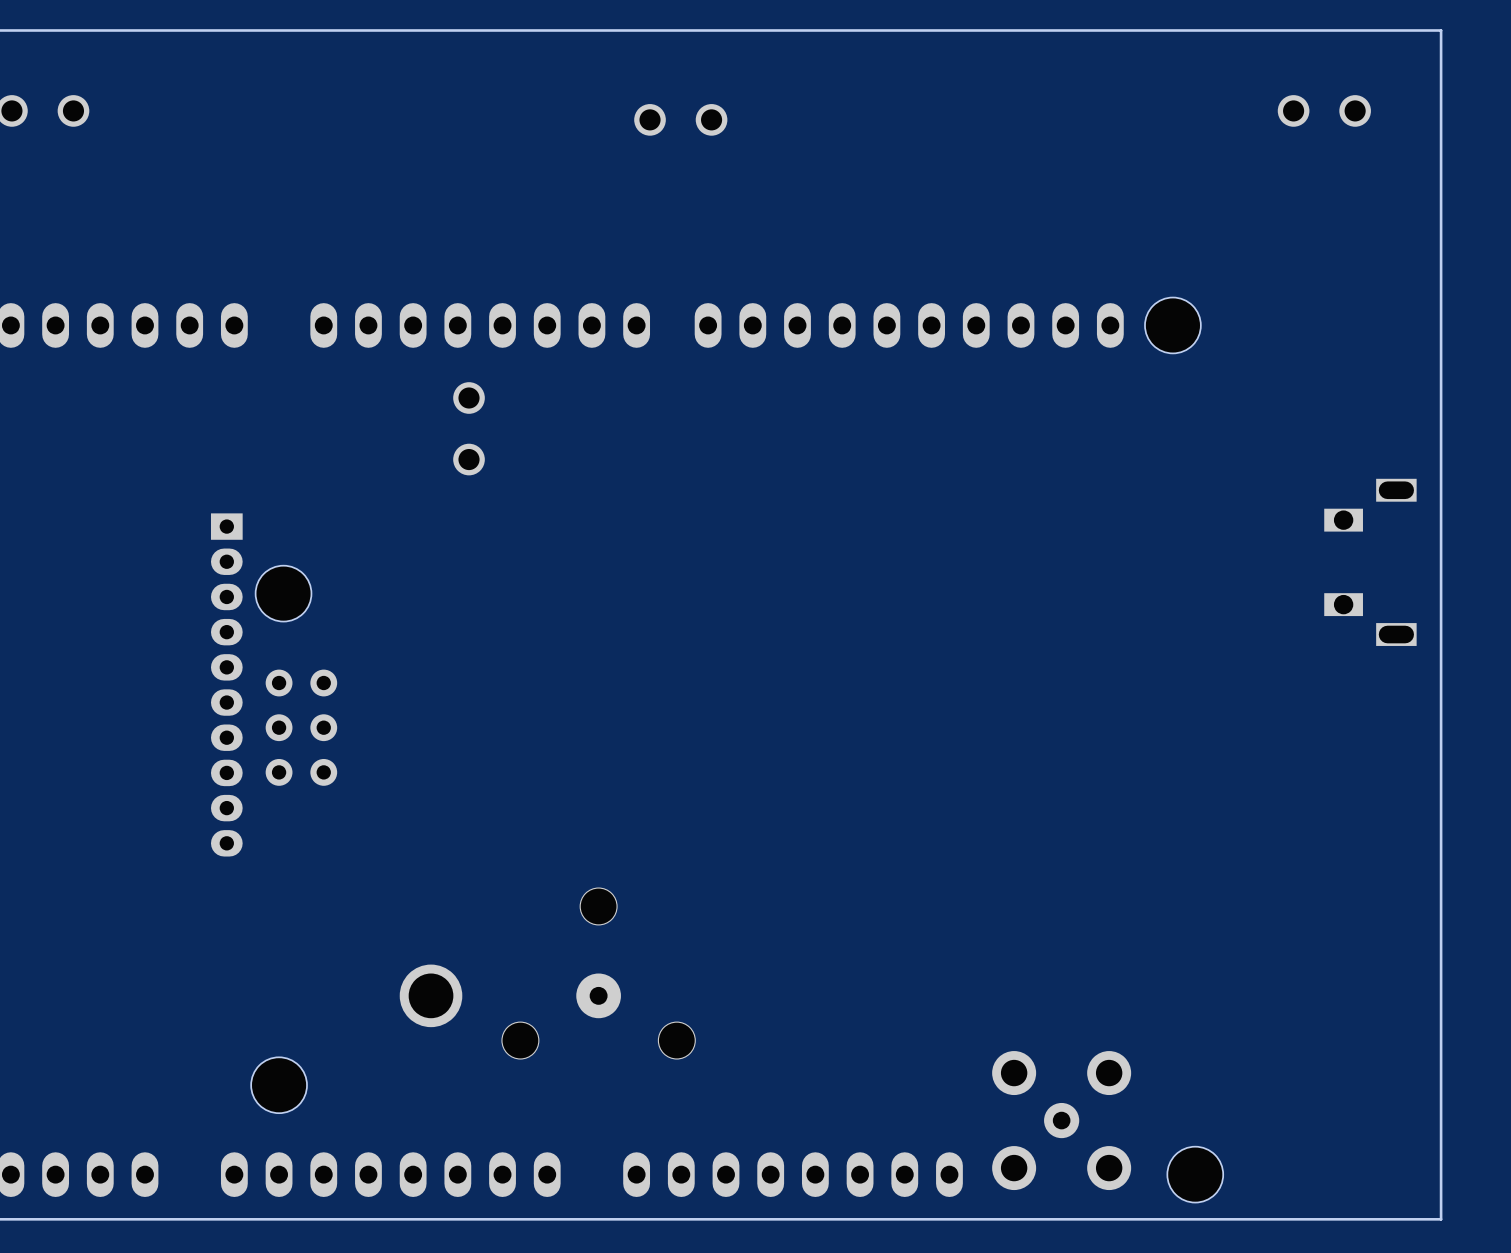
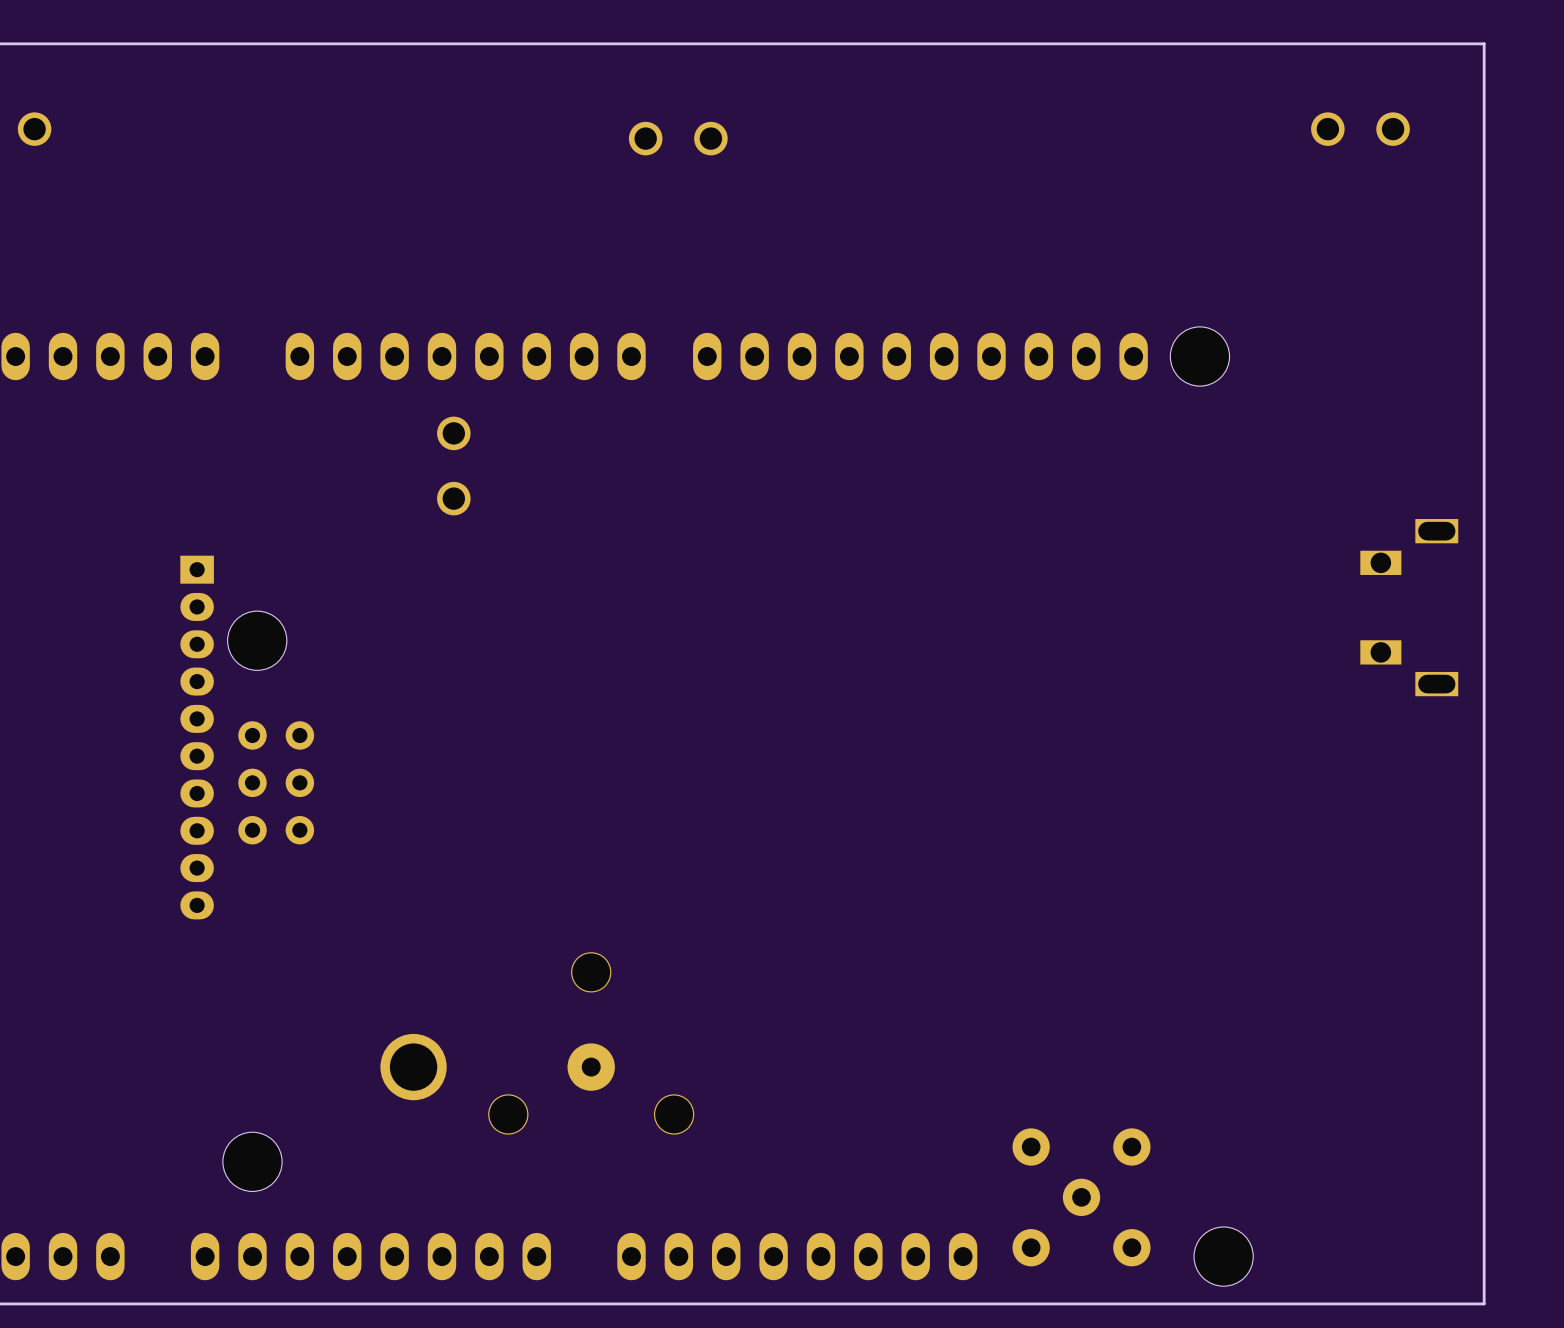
part footprint: [992, 1051, 1132, 1191] -> [1012, 1128, 1151, 1267]

